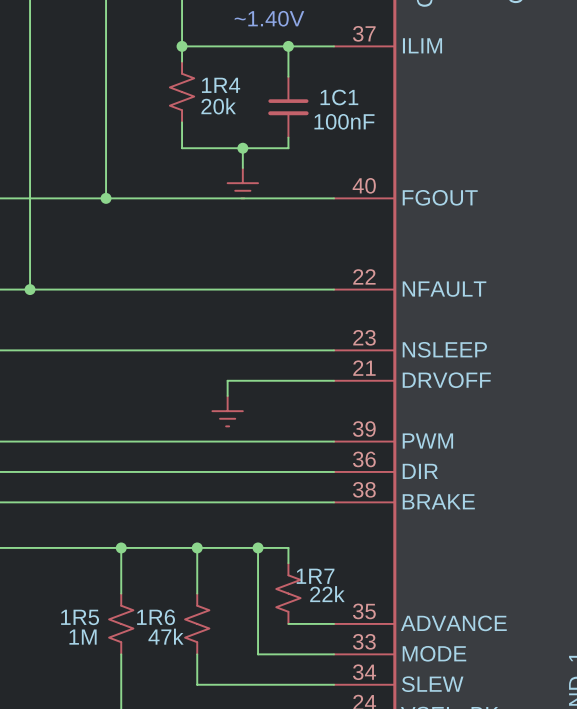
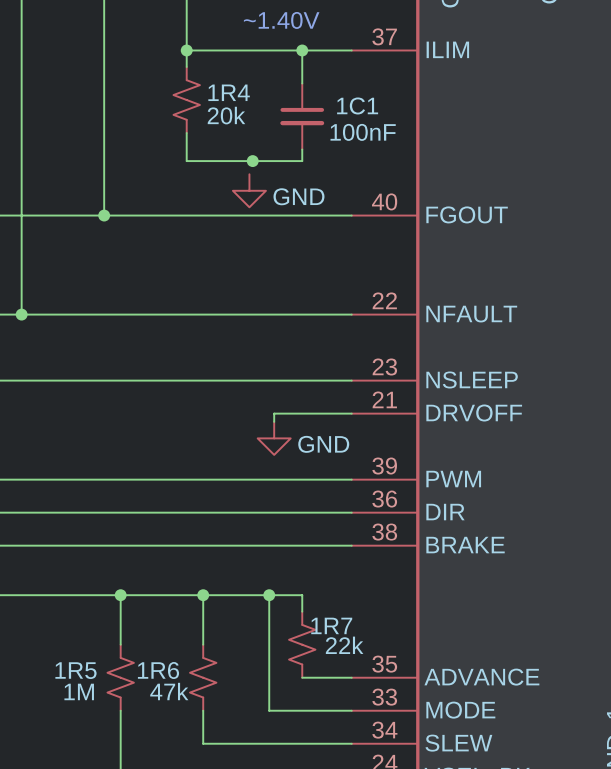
wire: (242, 148) (242, 167) -> none
power symbol shape: [227, 167, 259, 199] -> [232, 174, 266, 208]
power symbol text: none -> GND (298, 196)
wire: (262, 380) (227, 380) (227, 395) -> (274, 413) (274, 421)
power symbol: none -> GND (274, 438)
power symbol: (227, 411) -> none

